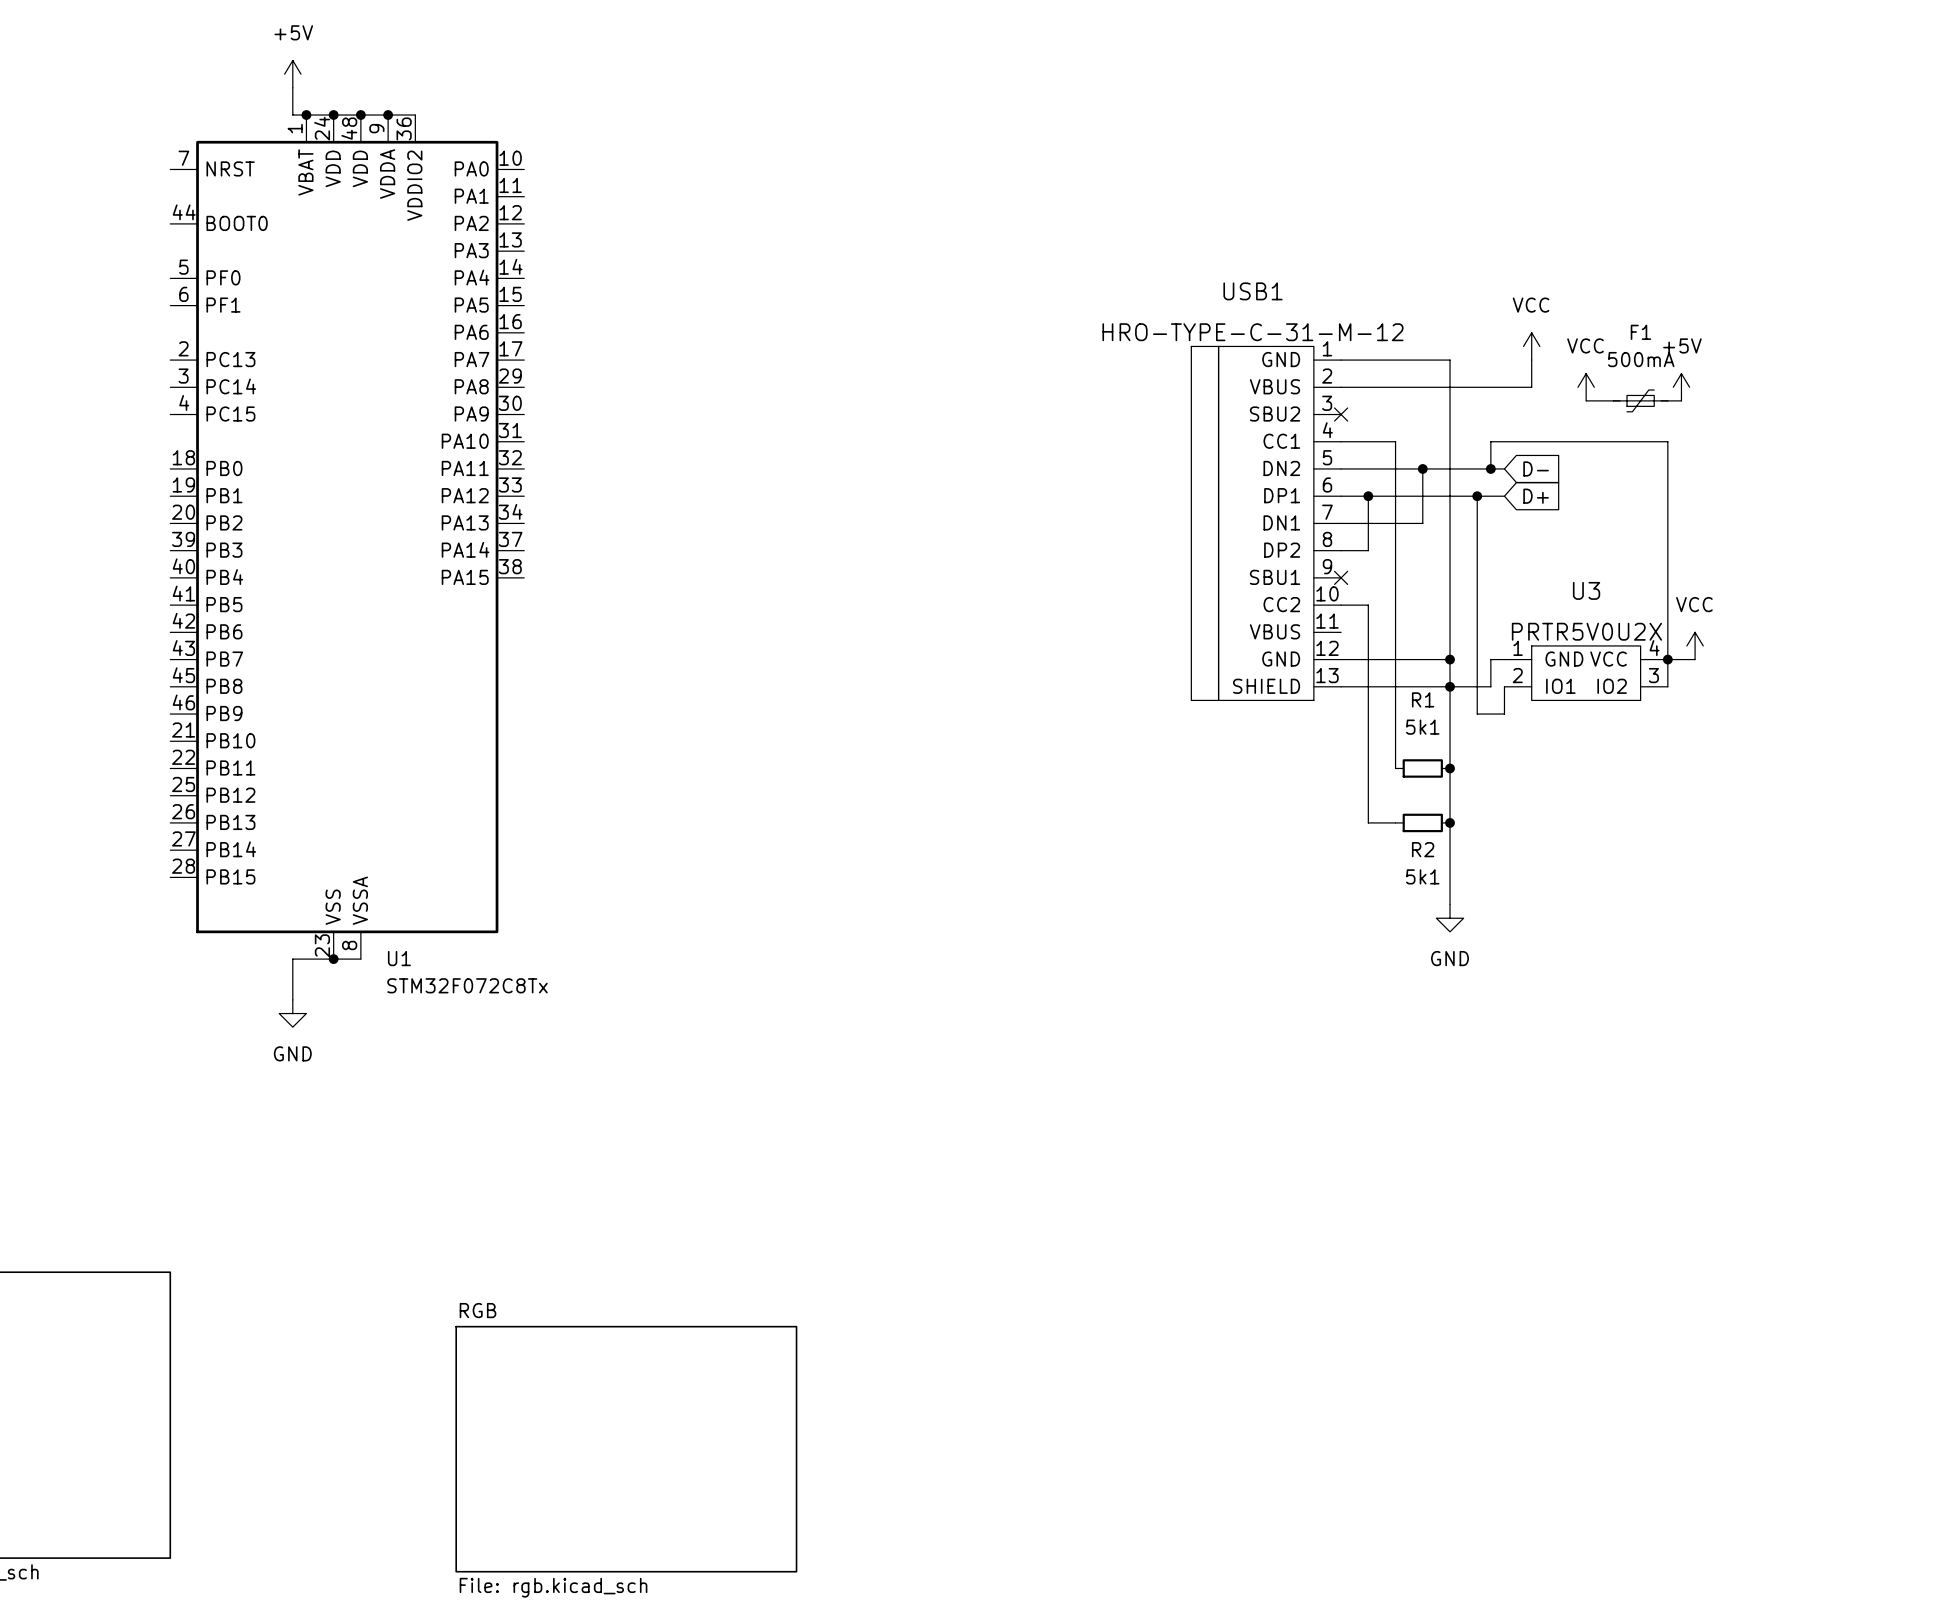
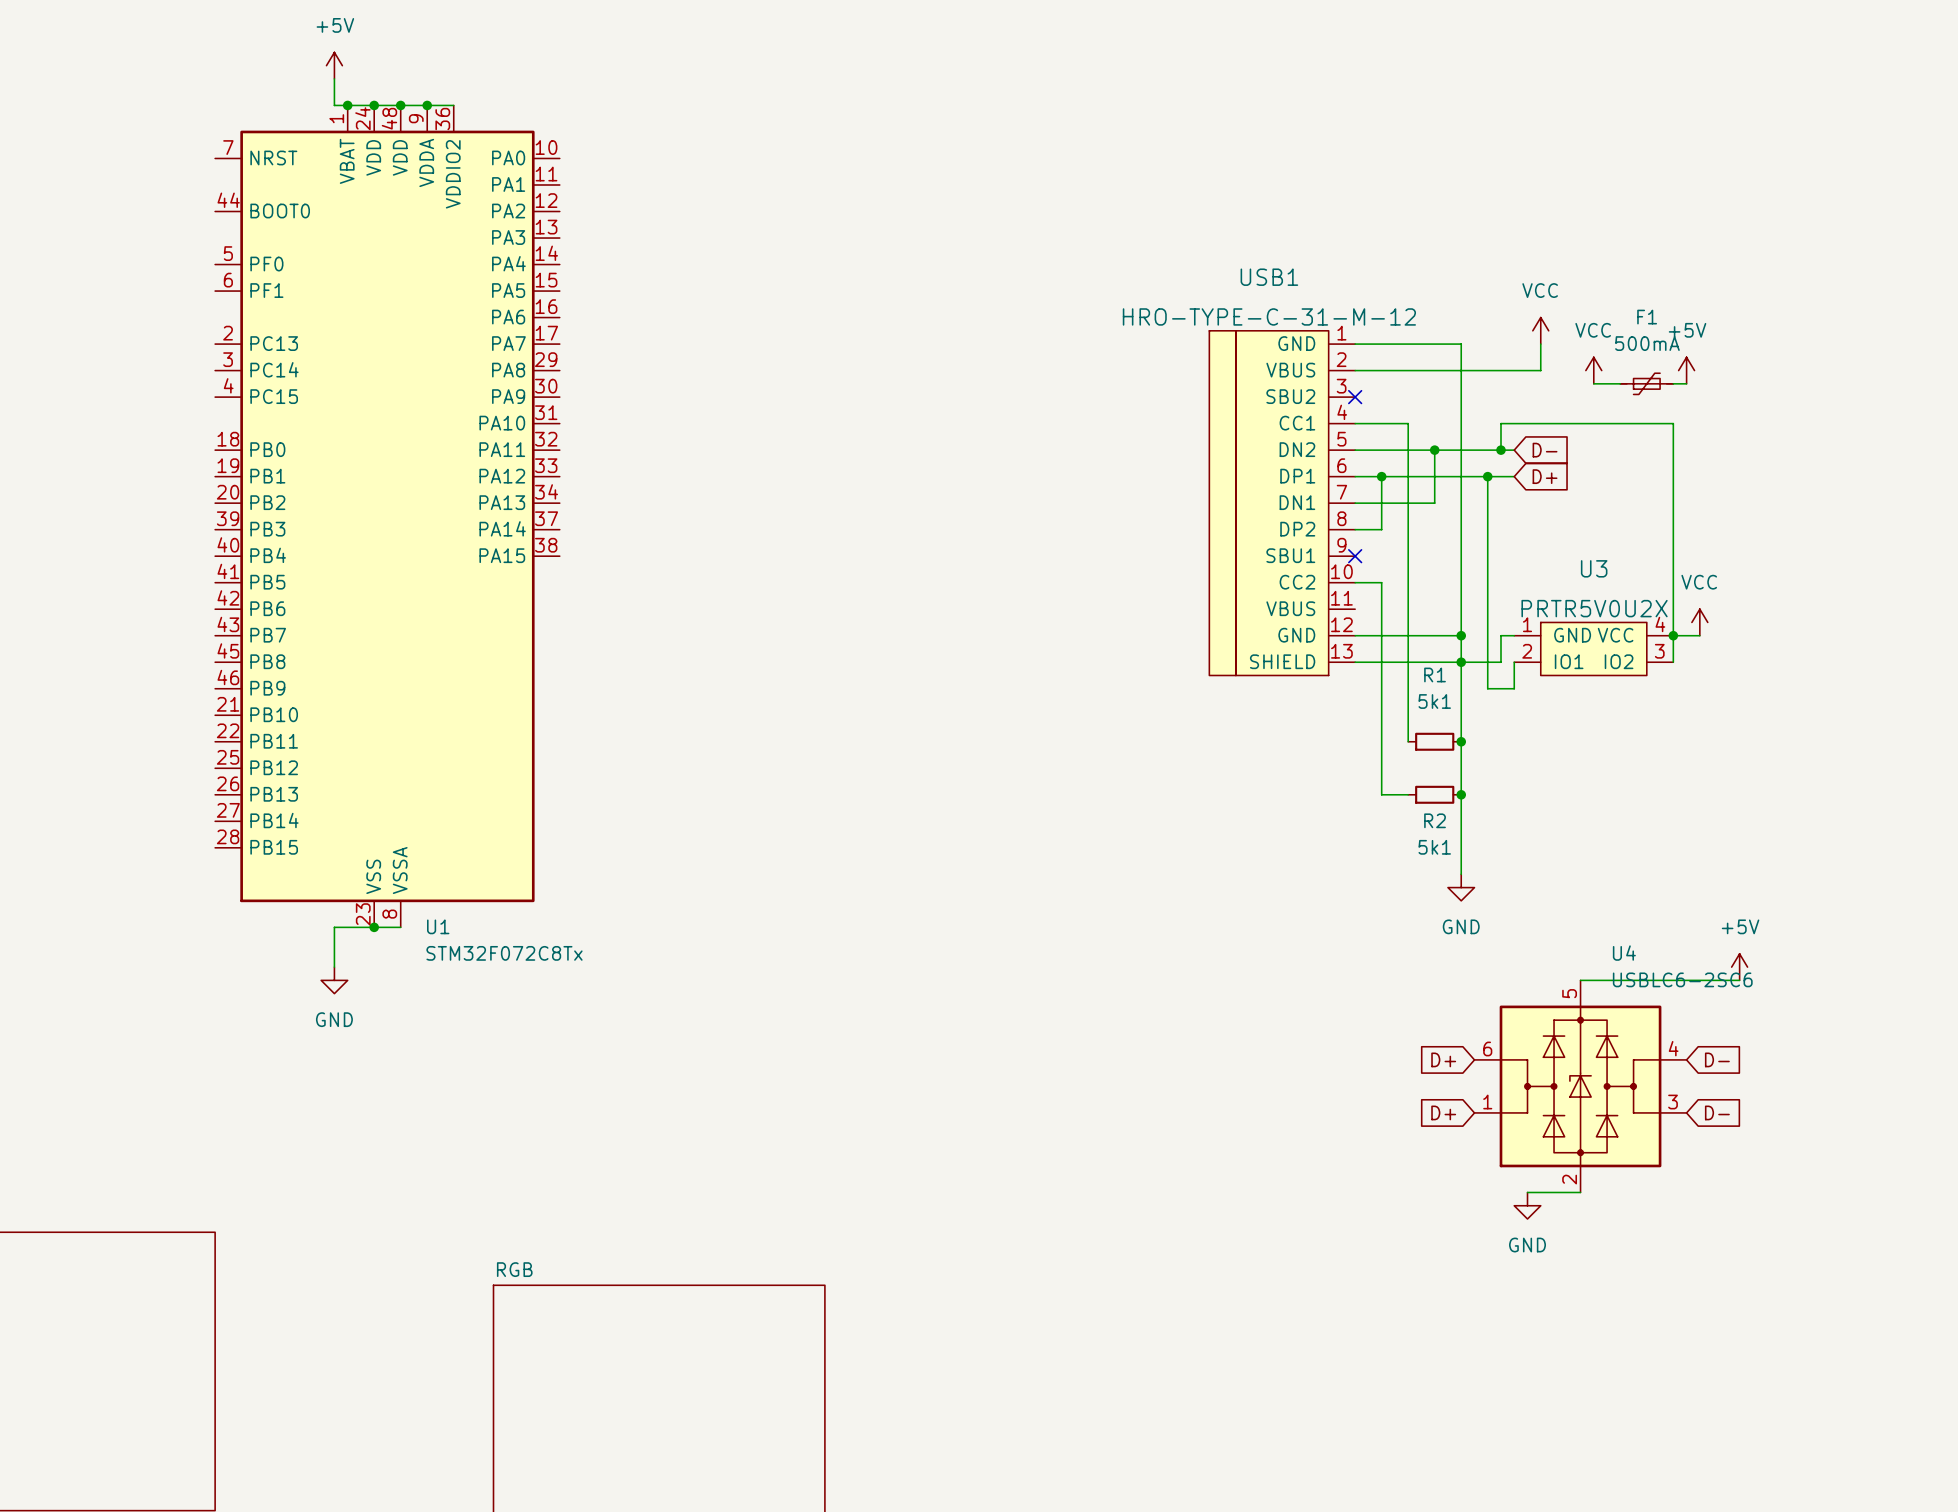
power symbol: none -> +5V (1739, 967)
wire: none -> (1580, 980) (1739, 980)
global label: none -> D+ (1443, 1059)
global label: none -> D- (1717, 1059)
U4: none -> USBLC6-2SC6 (1580, 1086)
global label: none -> D+ (1443, 1112)
global label: none -> D- (1717, 1112)
wire: none -> (1527, 1192) (1580, 1192)
power symbol: none -> GND (1527, 1205)

